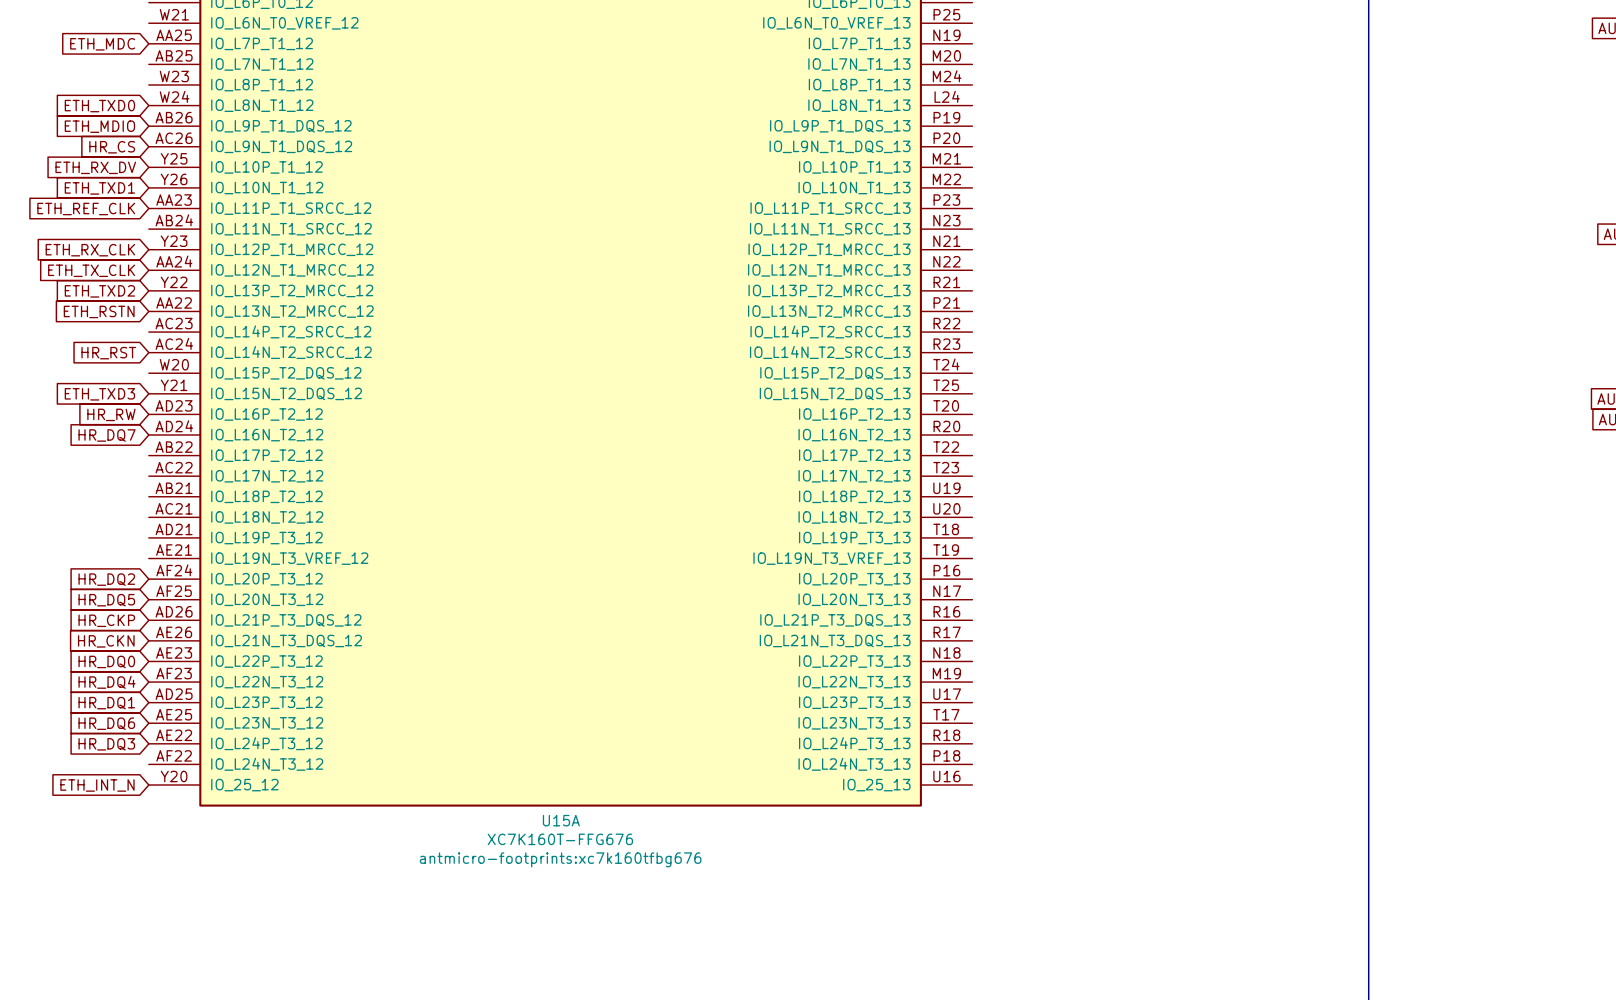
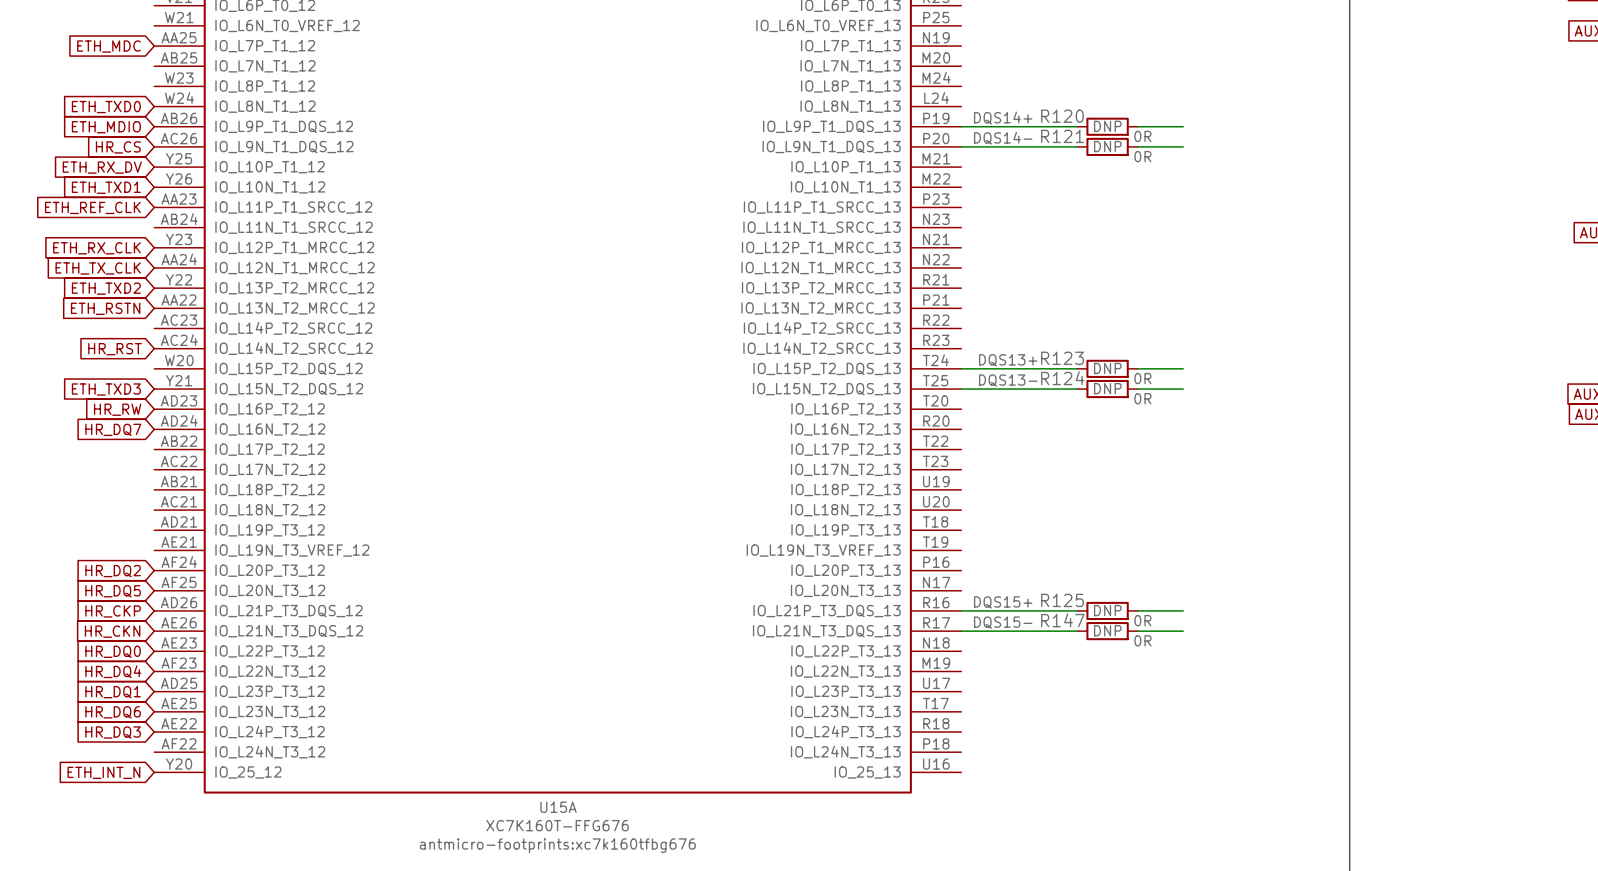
label: none -> DQS14+ (1003, 117)
wire: none -> (961, 126) (1077, 126)
R120: none -> (1107, 126)
wire: none -> (1137, 126) (1183, 126)
label: none -> DQS14- (1003, 138)
wire: none -> (961, 146) (1077, 146)
R121: none -> (1107, 146)
wire: none -> (1137, 146) (1183, 146)
label: none -> DQS13+ (1008, 360)
wire: none -> (961, 368) (1077, 368)
R123: none -> (1107, 368)
wire: none -> (1137, 368) (1183, 368)
label: none -> DQS13- (1008, 380)
wire: none -> (961, 389) (1077, 389)
R124: none -> (1107, 389)
wire: none -> (1137, 389) (1183, 389)
label: none -> DQS15+ (1003, 602)
wire: none -> (961, 610) (1077, 610)
R125: none -> (1107, 610)
wire: none -> (1137, 610) (1183, 610)
label: none -> DQS15- (1003, 622)
wire: none -> (961, 631) (1077, 631)
R147: none -> (1107, 631)
wire: none -> (1137, 631) (1183, 631)

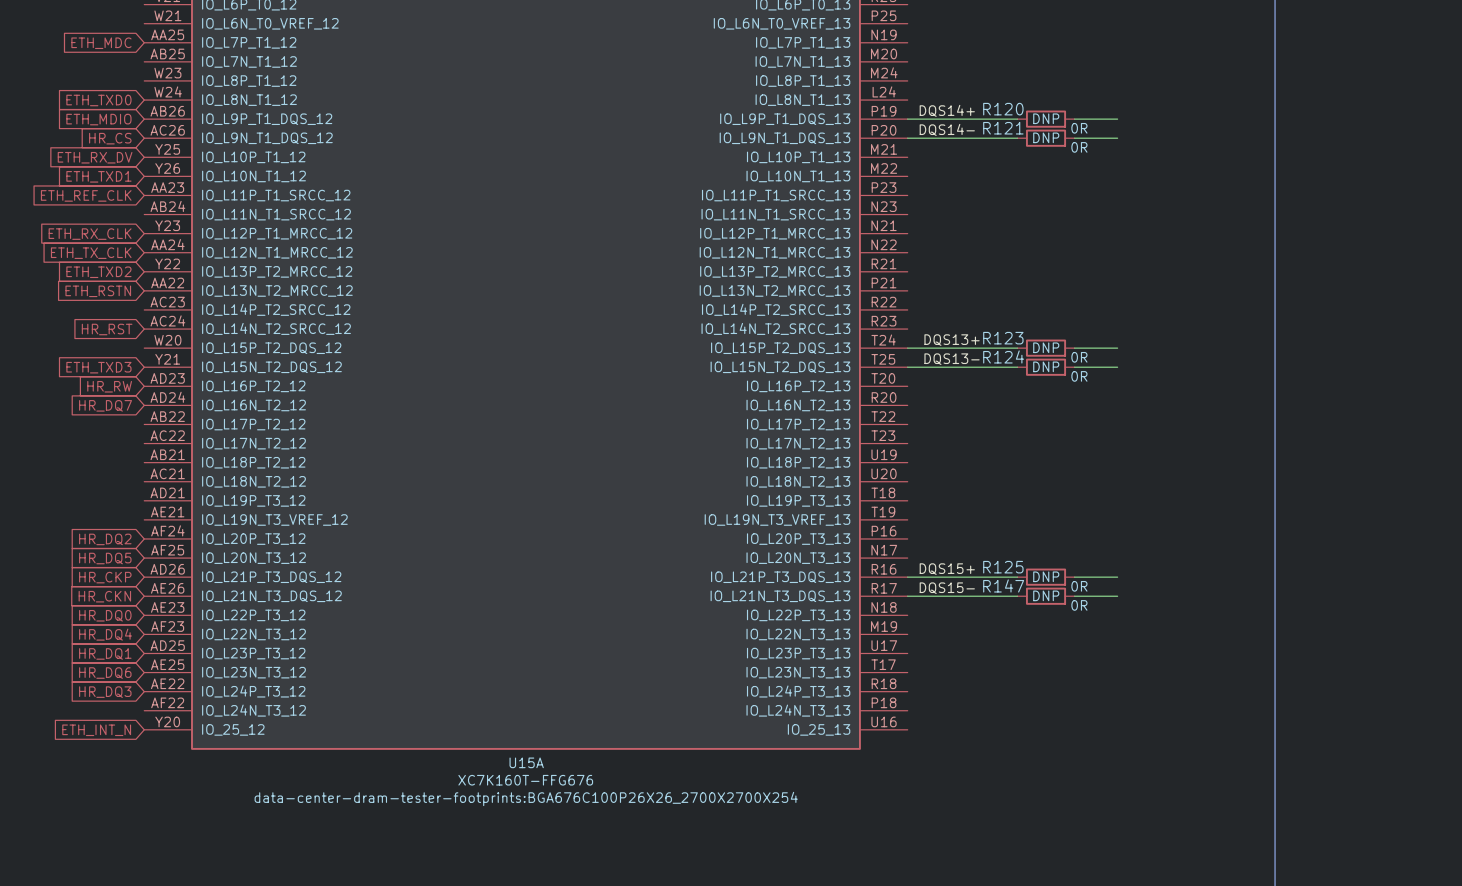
U15A text: antmicro-footprints:xc7k160tfbg676 (557, 845) -> data-center-dram-tester-footprints:BGA676C100P26X26_2700X2700X254 (526, 798)

